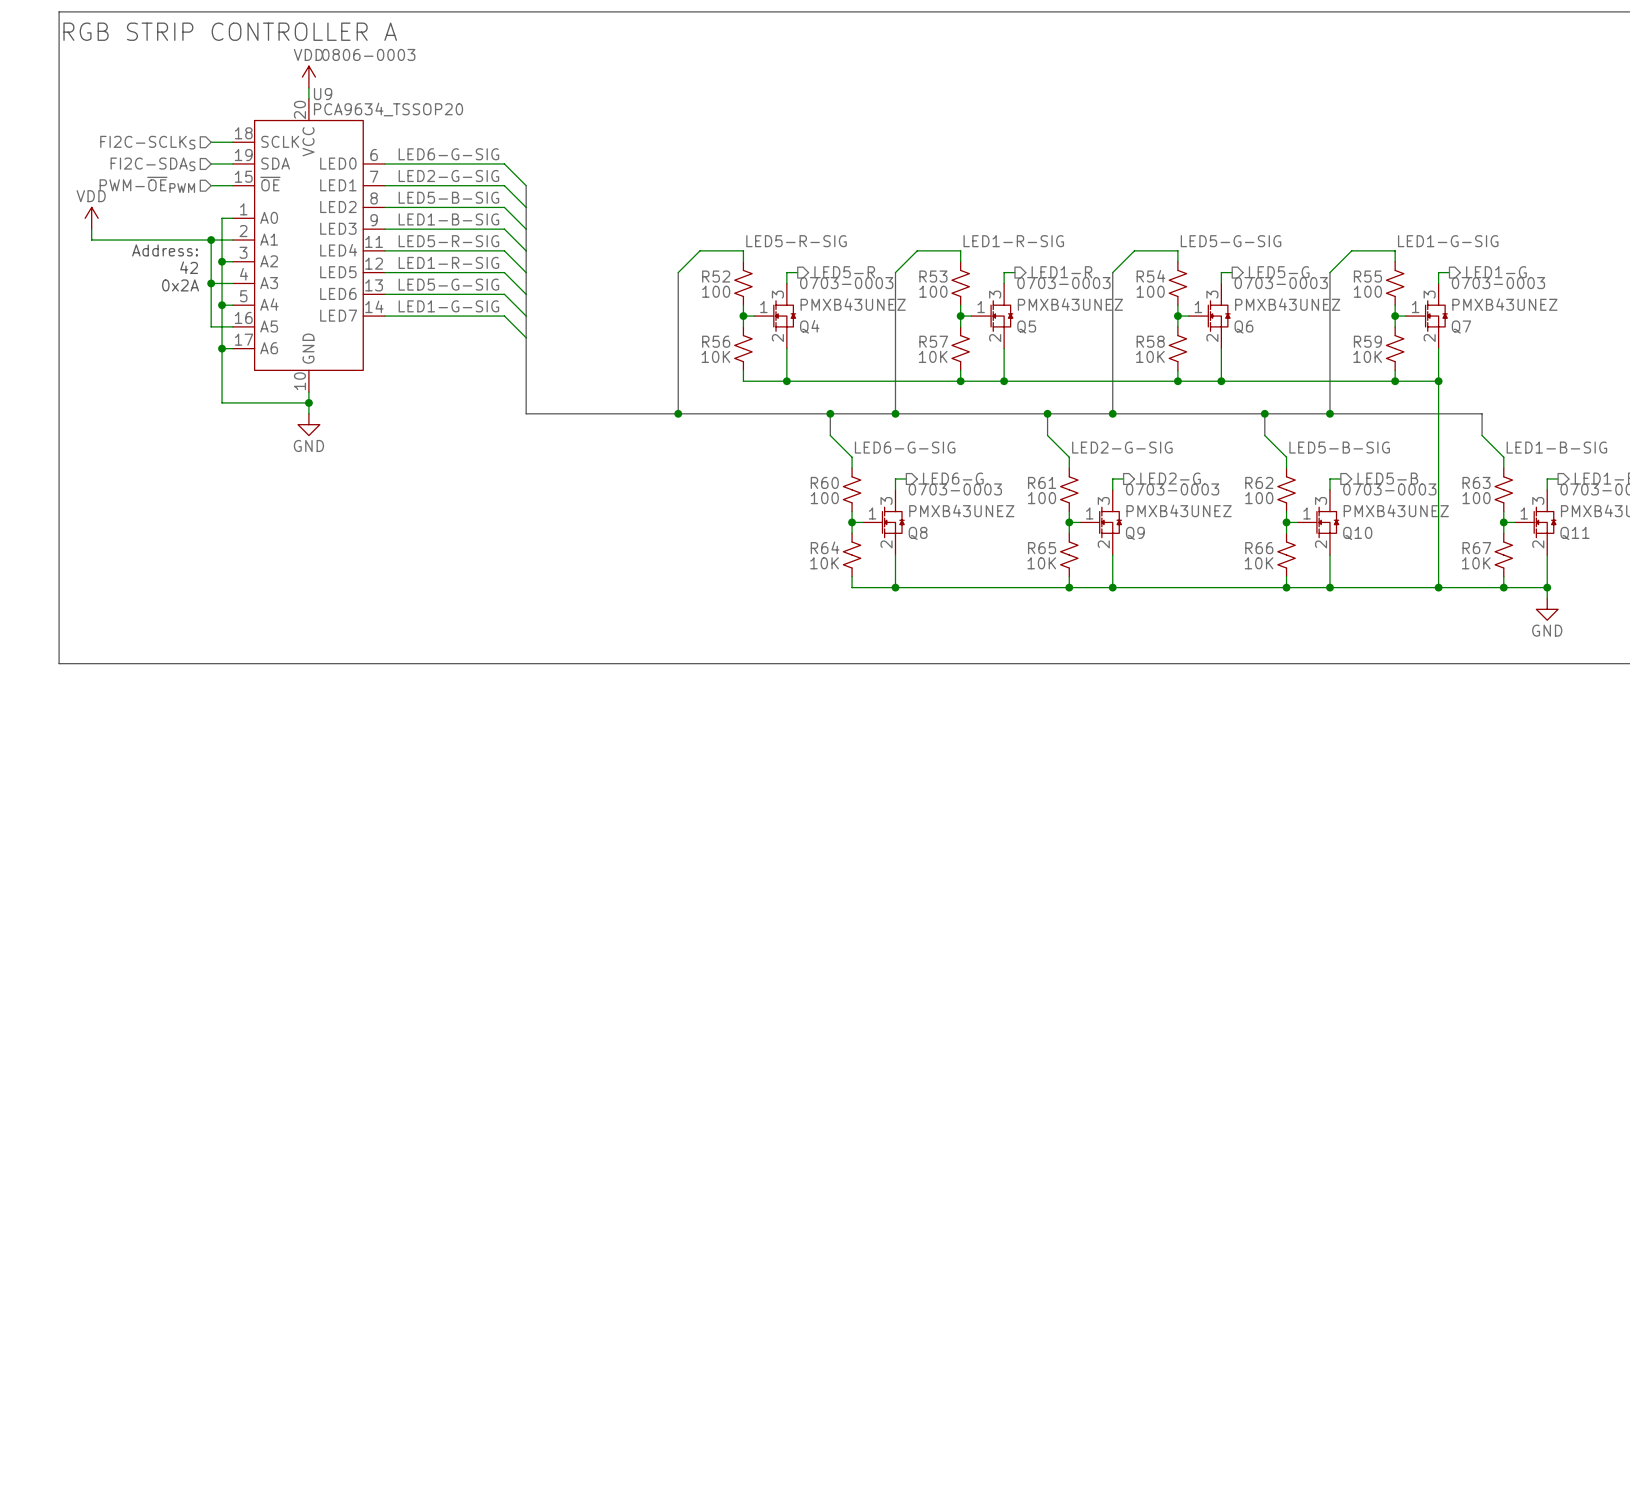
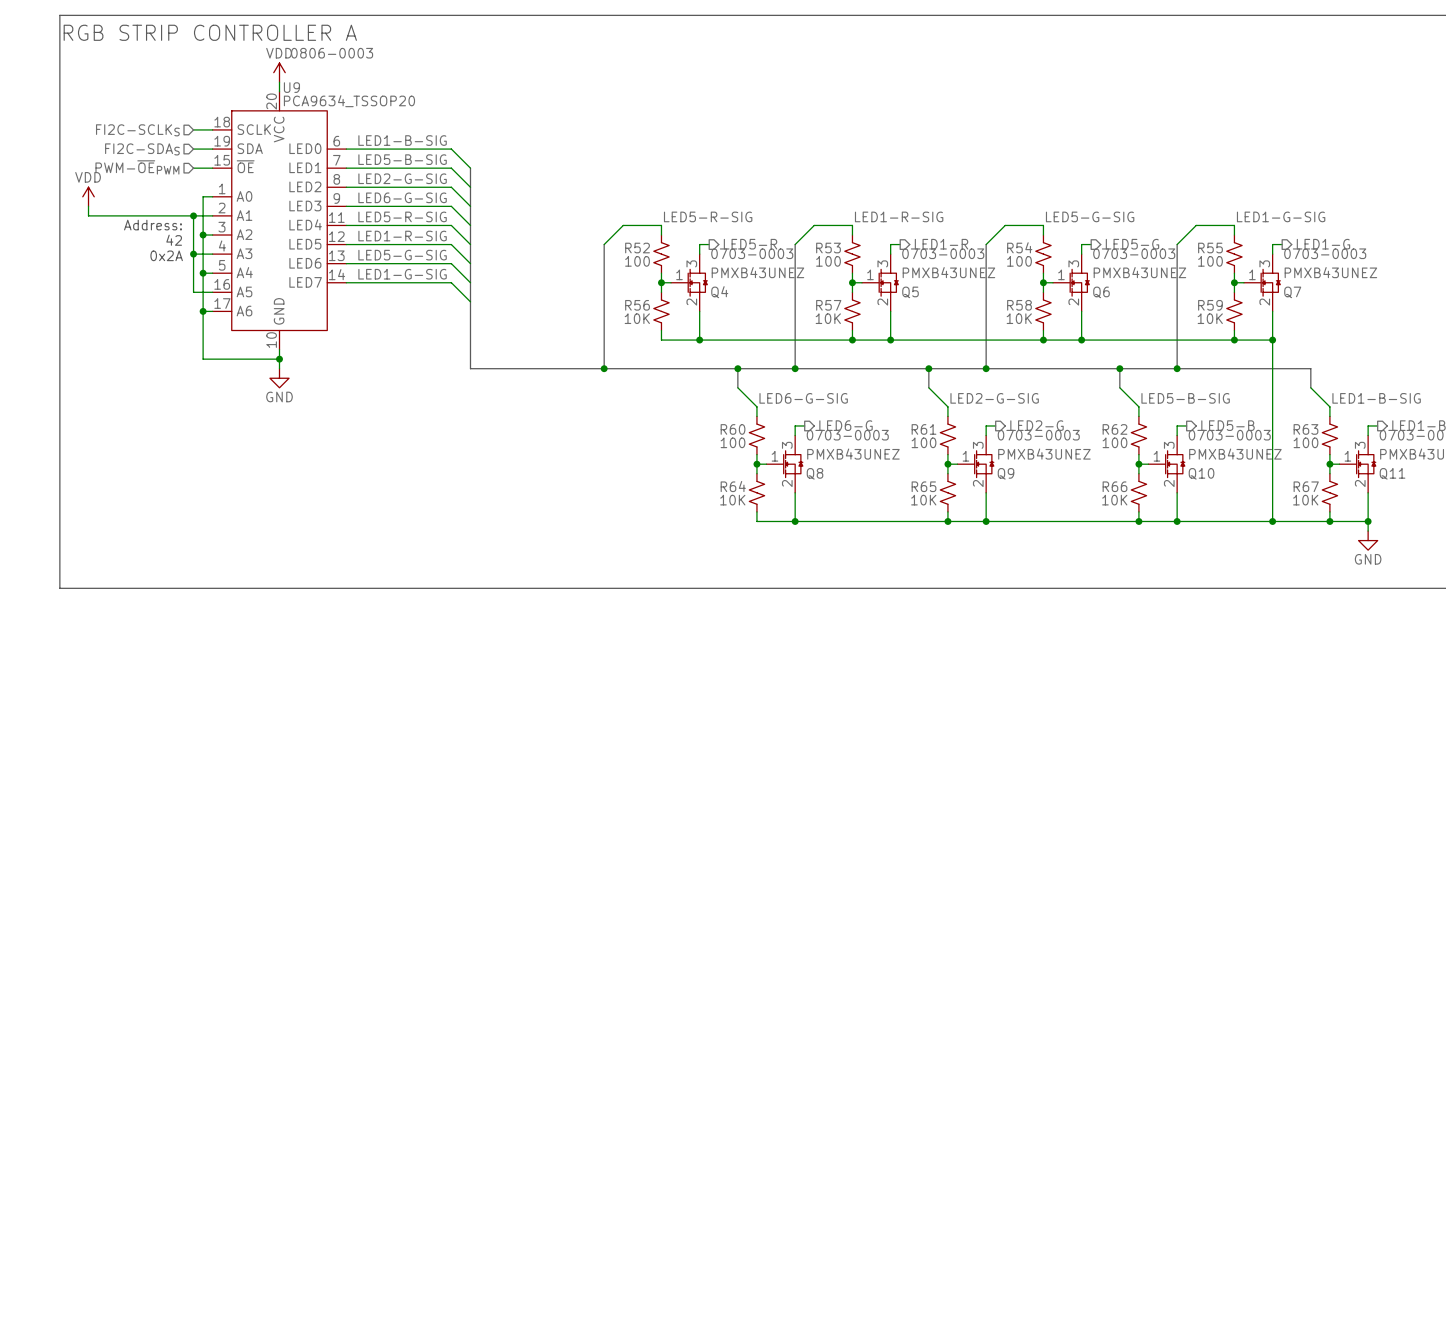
label: LED6-G-SIG (448, 154) -> LED1-B-SIG (402, 140)
label: LED2-G-SIG (448, 176) -> LED5-B-SIG (402, 159)
label: LED5-B-SIG (448, 197) -> LED2-G-SIG (402, 178)
label: LED1-B-SIG (448, 219) -> LED6-G-SIG (402, 197)

